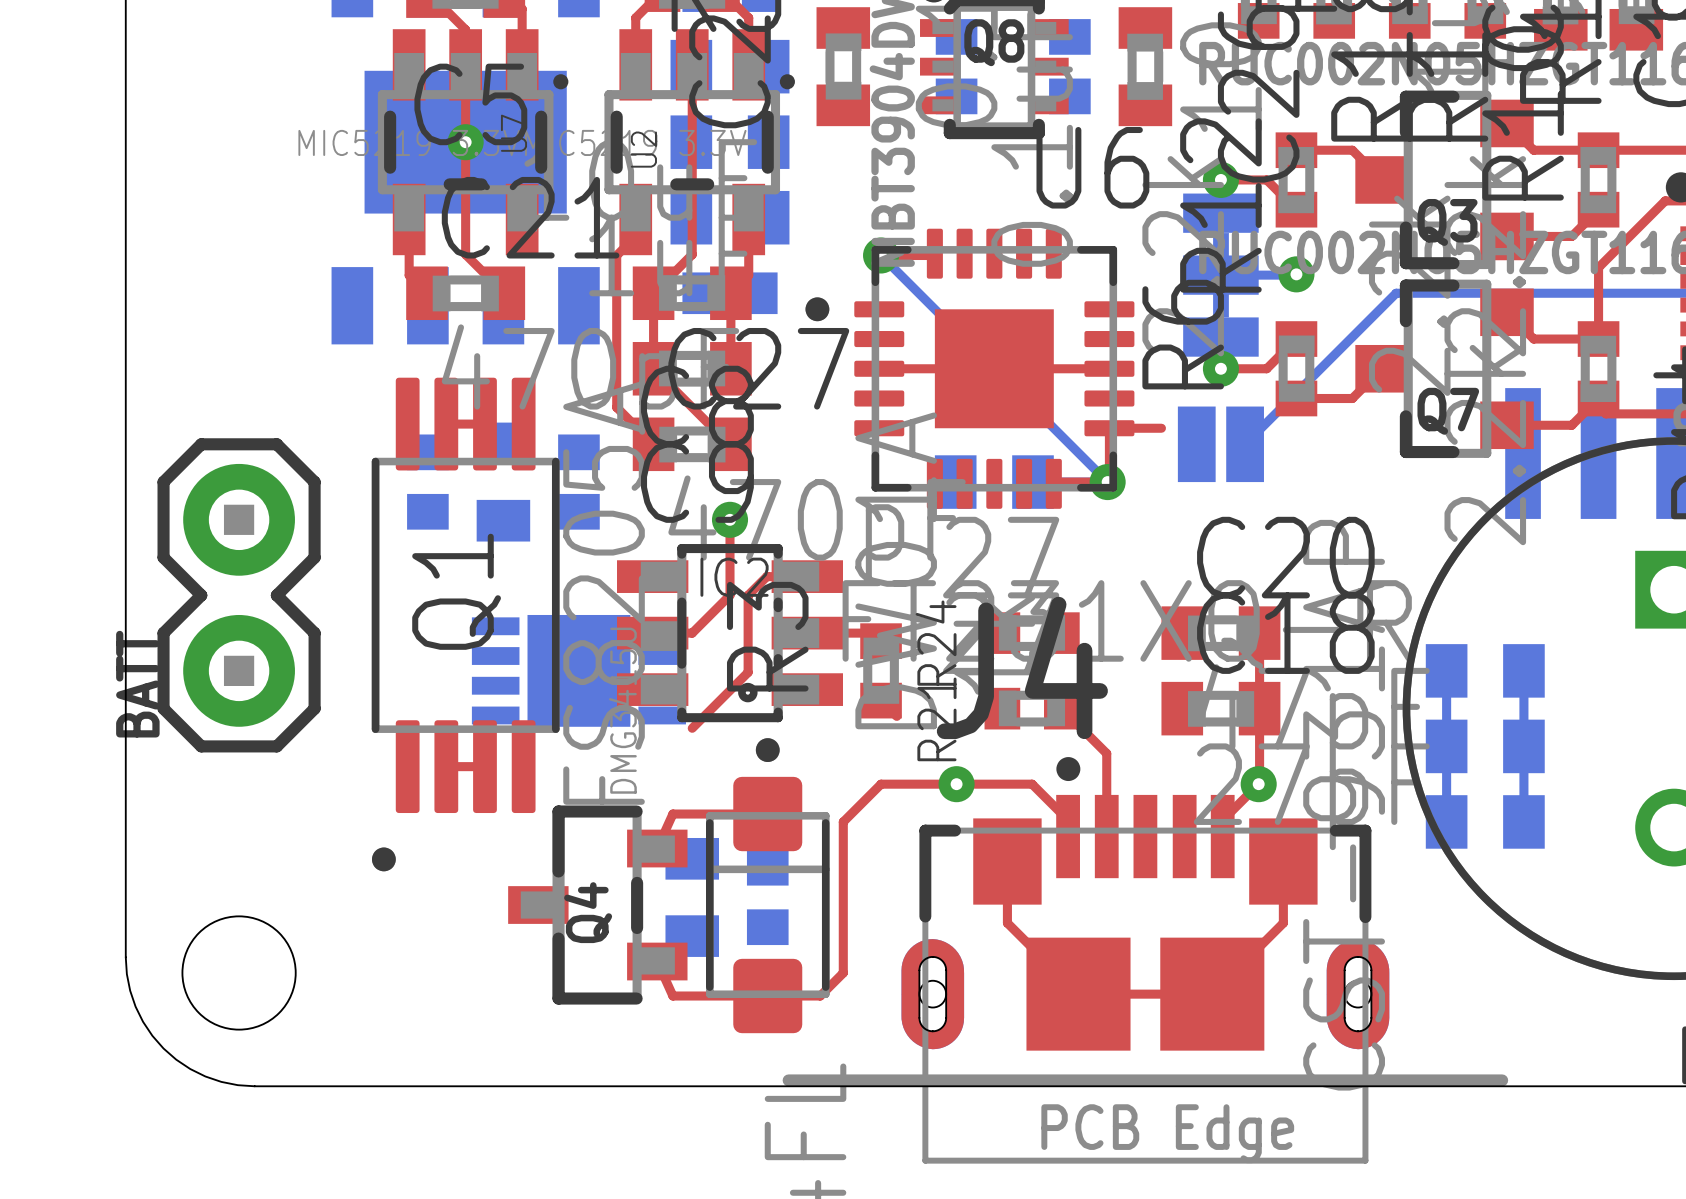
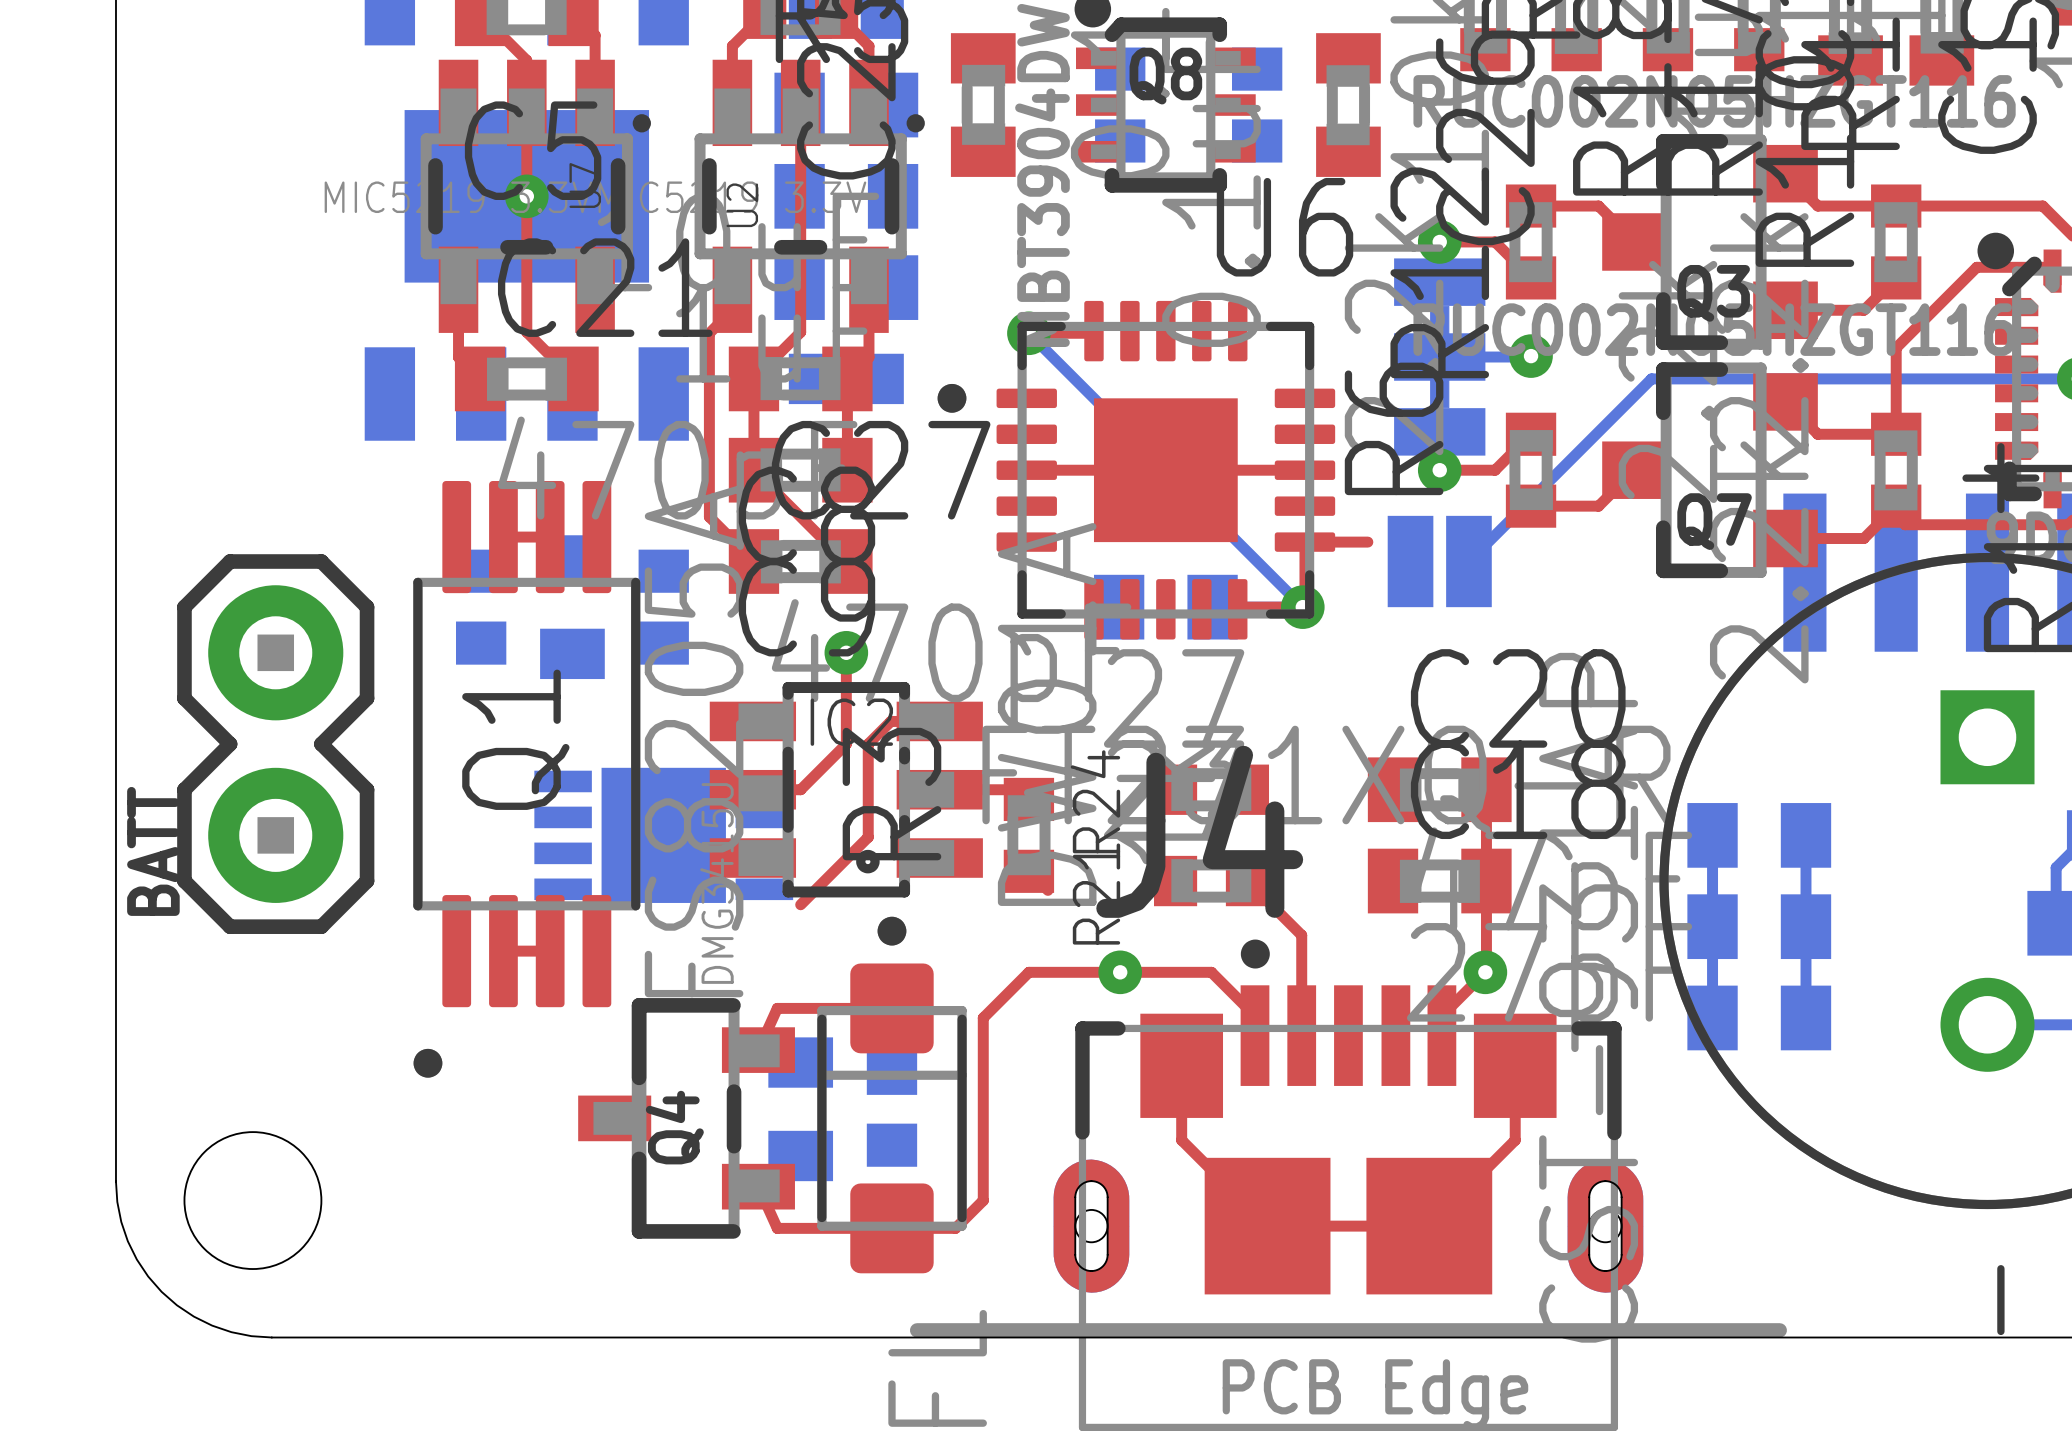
BATT position: (239, 595) -> (275, 744)

